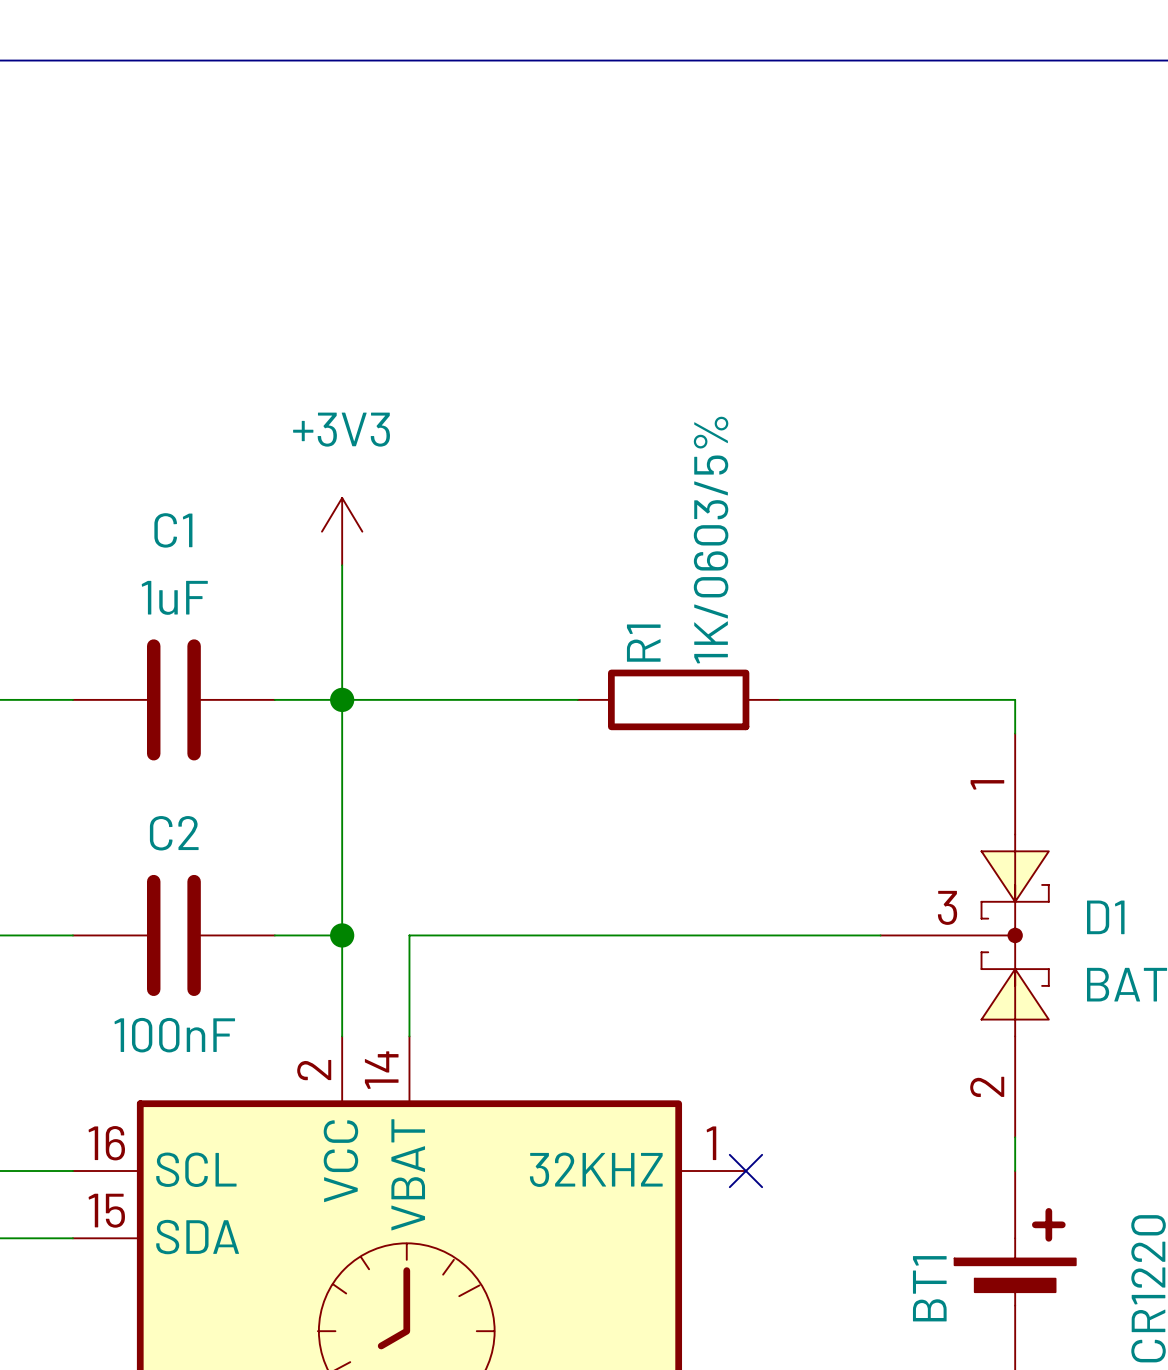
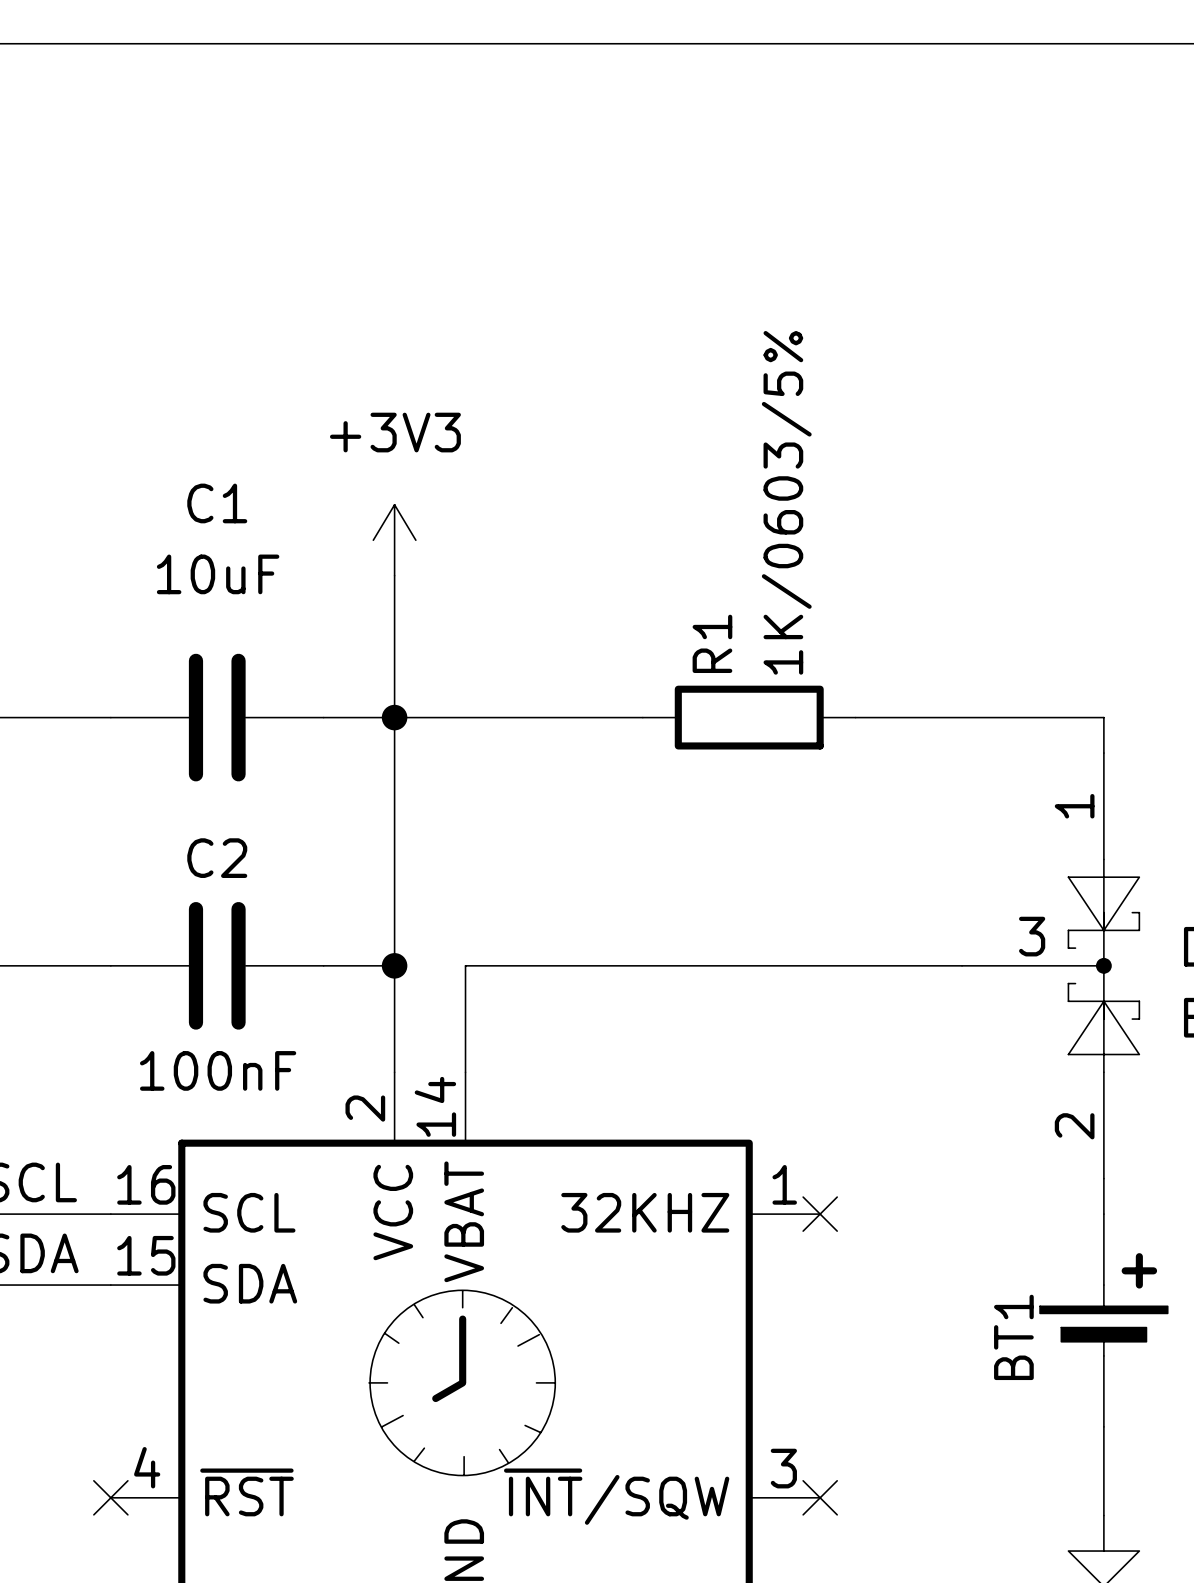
C1 name position: C1 (173, 530) -> C1 (217, 503)
C1 value: 1uF (174, 597) -> 10uF (218, 574)

